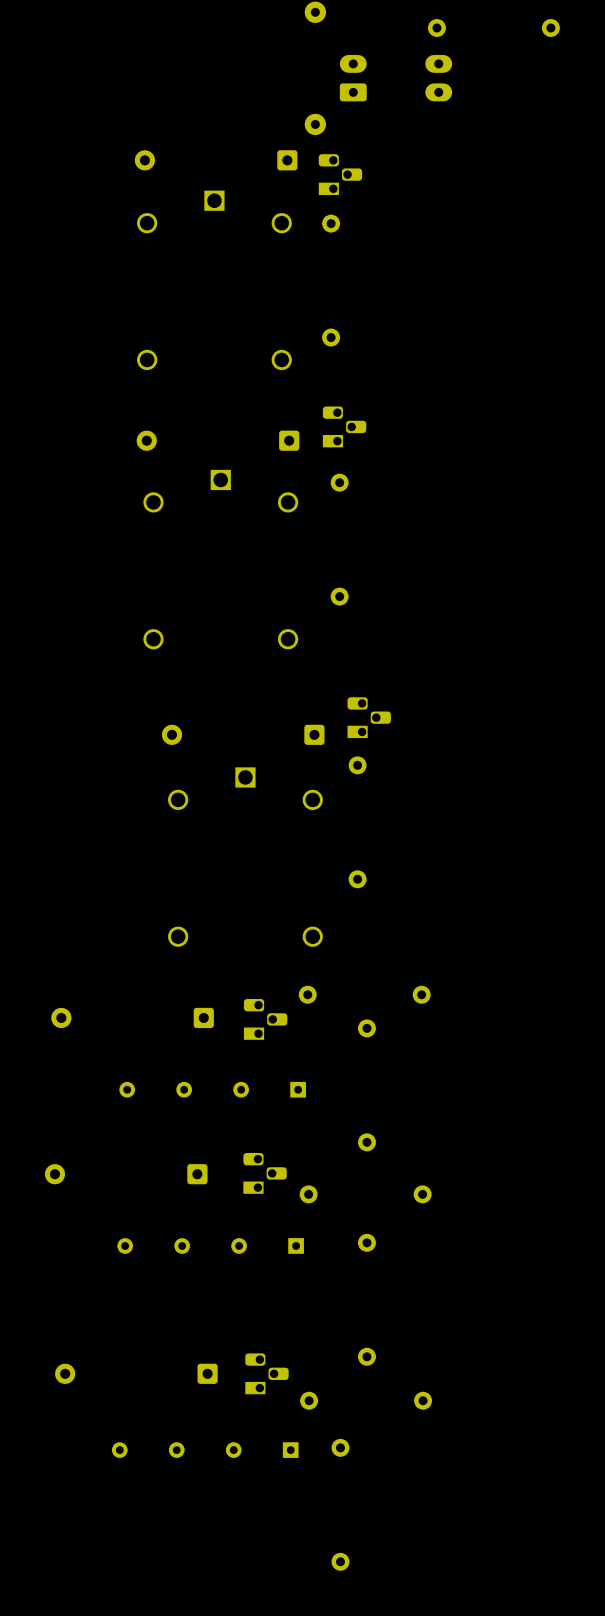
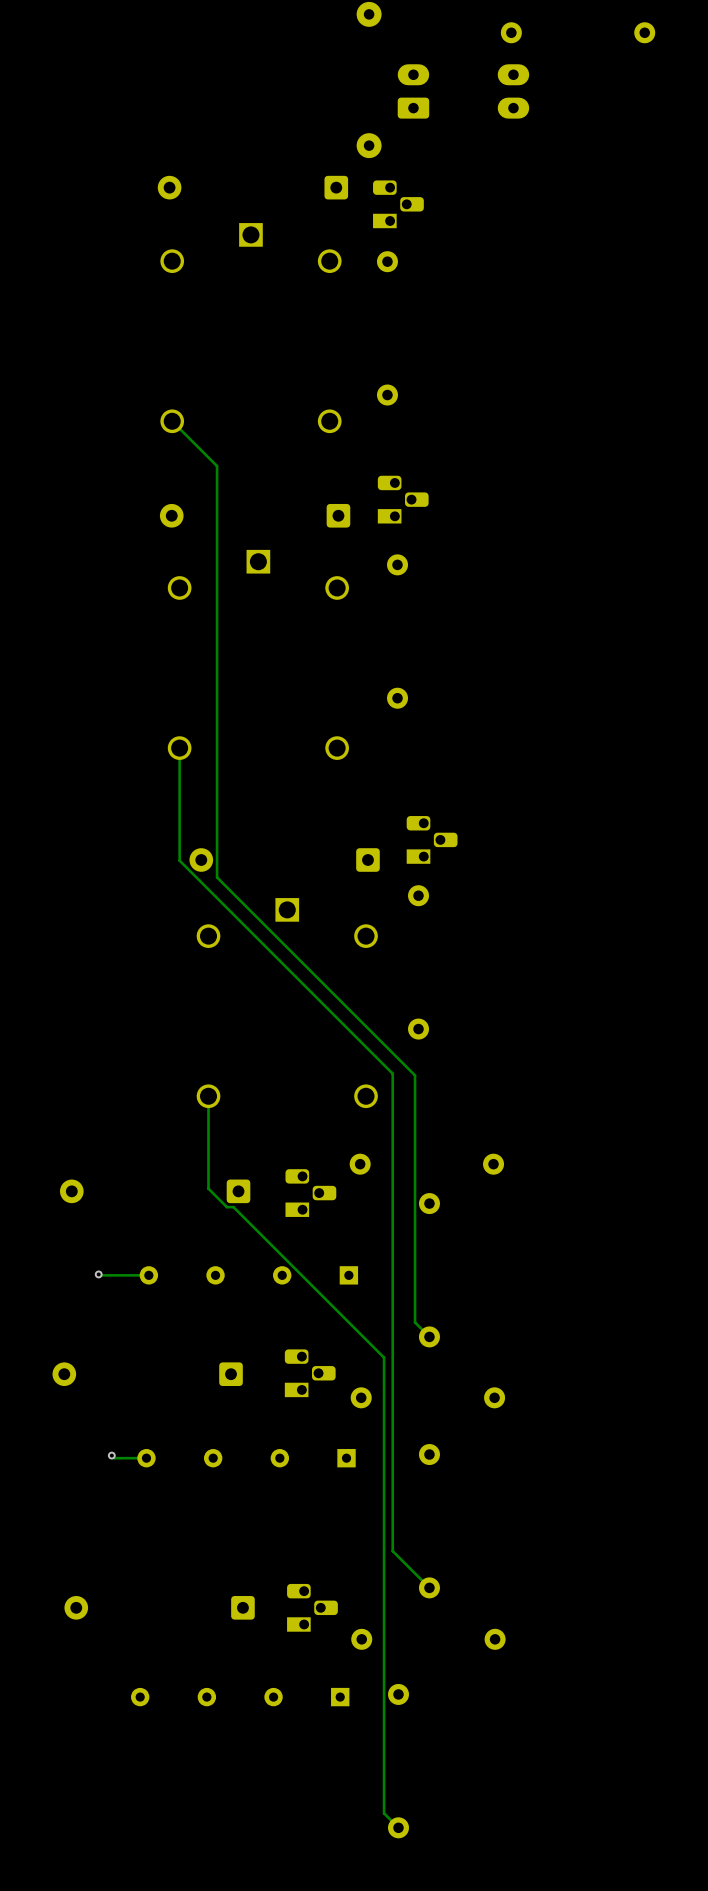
track: none -> (172, 421) (217, 466) (217, 877) (415, 1075) (415, 1322) (429, 1336)
track: none -> (179, 748) (179, 860) (392, 1073) (392, 1551) (429, 1587)
track: none -> (208, 1096) (208, 1188) (226, 1207) (233, 1207) (384, 1357) (384, 1813) (398, 1827)
track: none -> (98, 1274) (148, 1275)
via: none -> (98, 1274)
track: none -> (111, 1455) (114, 1458) (146, 1458)
via: none -> (111, 1455)

